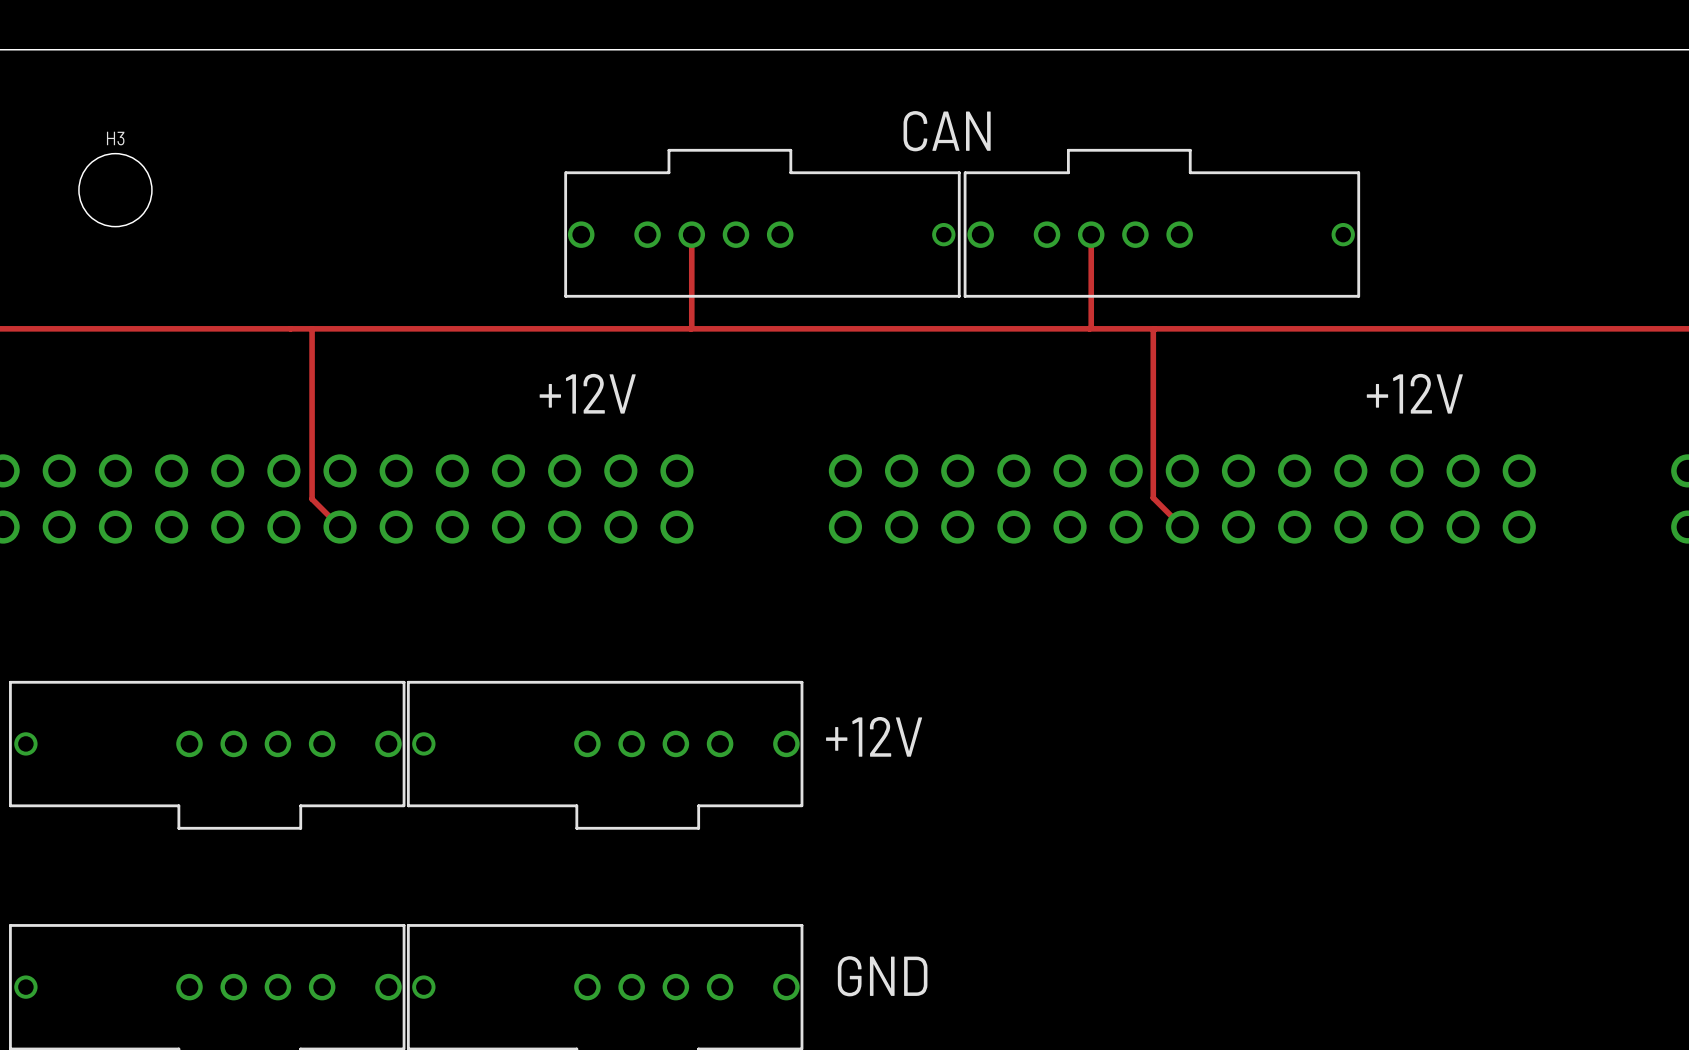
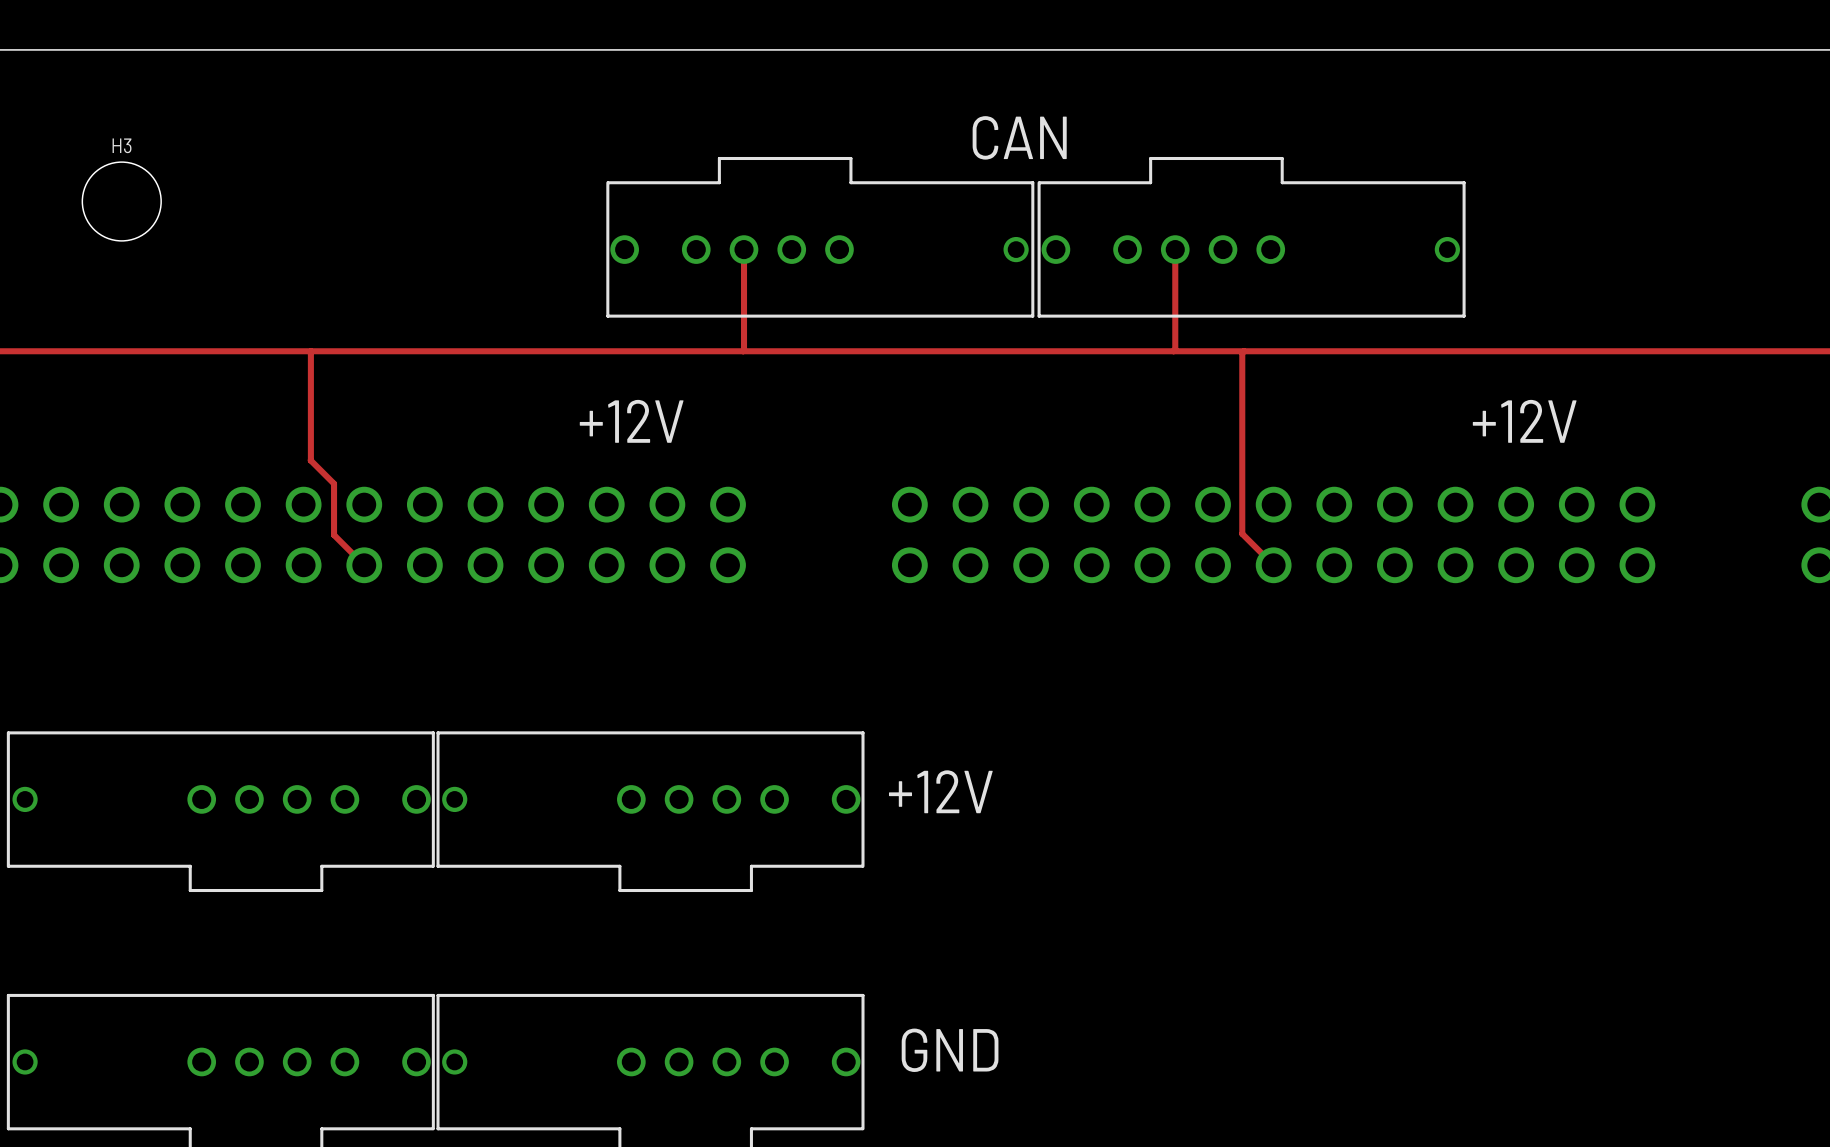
track: none -> (310, 351) (310, 460)
track: (312, 328) (312, 451) -> (310, 460) (334, 483)

